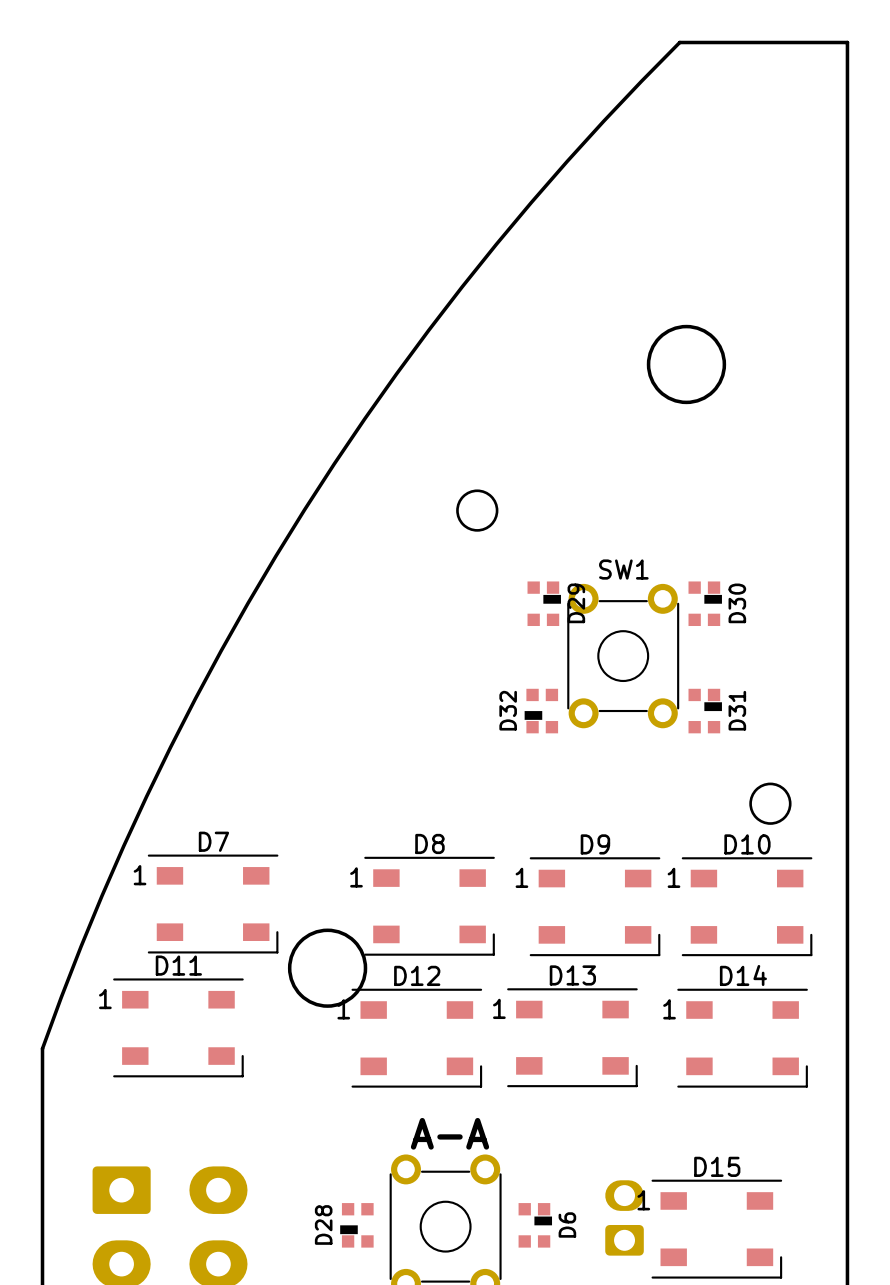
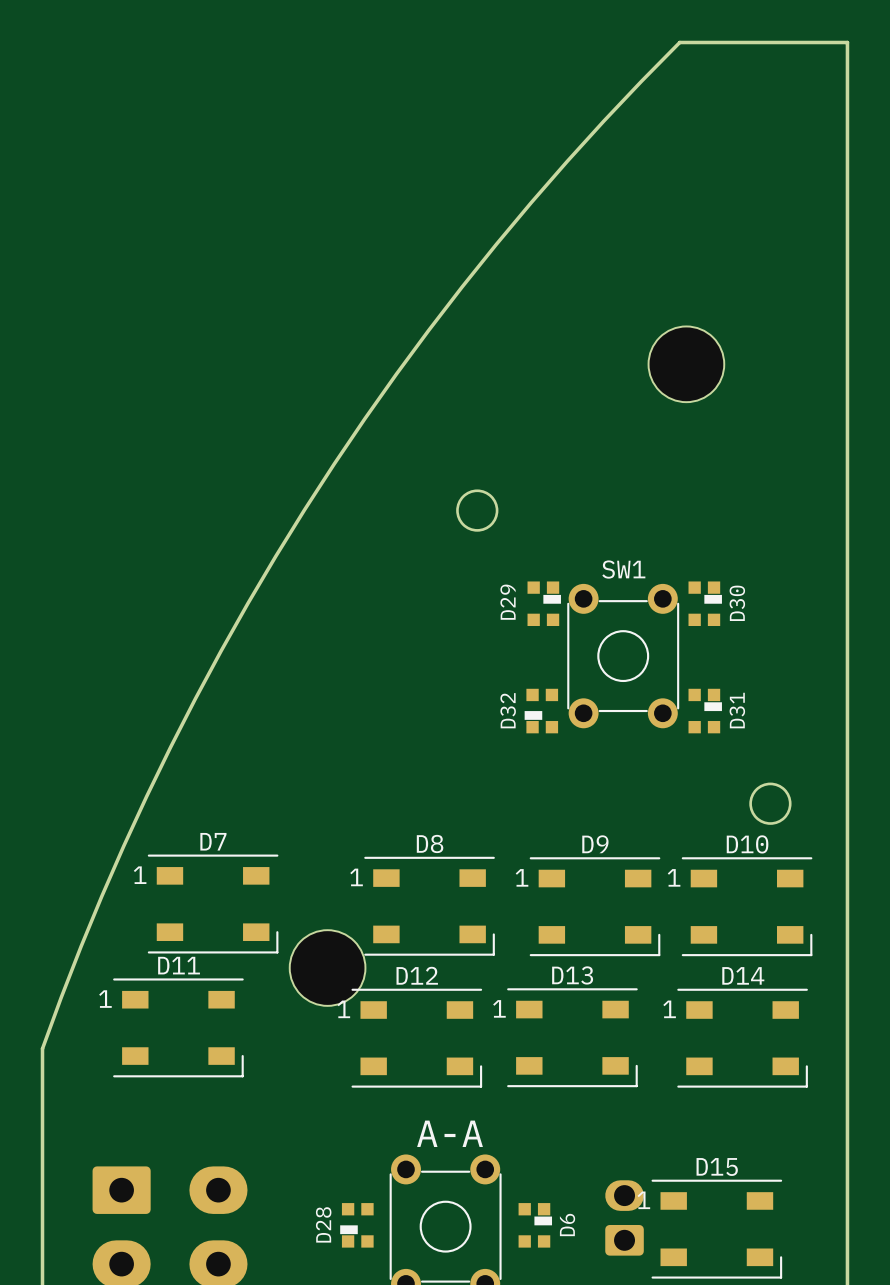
round board edge: [646, 324, 727, 405] -> none
part: none -> (686, 364)
D29 name position: D29 (576, 603) -> D29 (508, 602)
round board edge: [287, 928, 368, 1008] -> none
part: none -> (327, 968)

